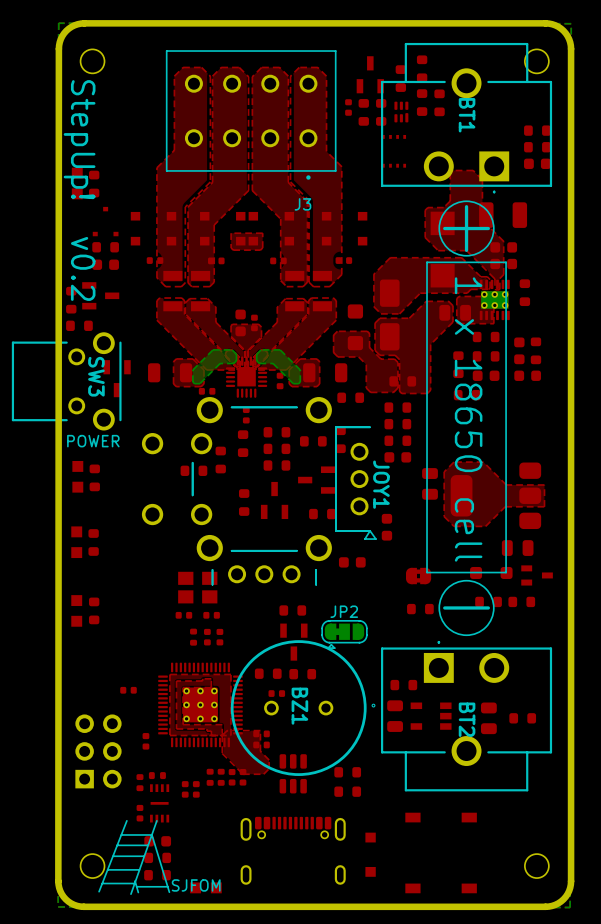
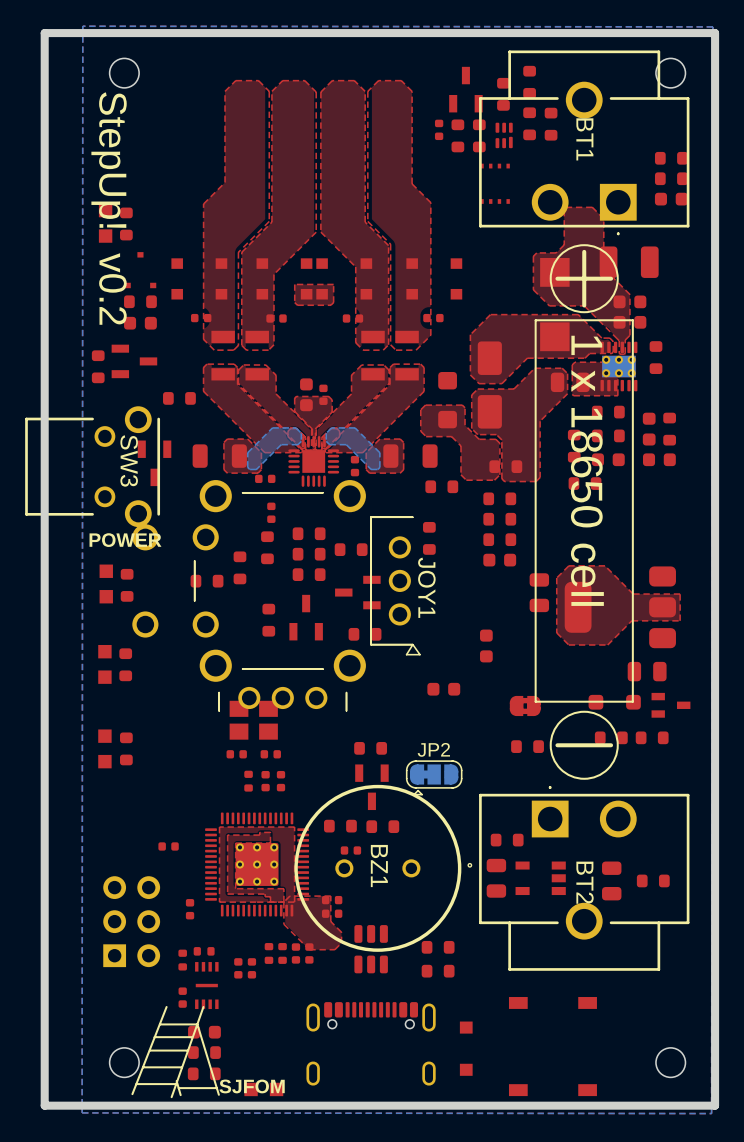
board edge: (545, 23) (84, 23) (71, 26) (62, 36) (58, 48) (58, 881) (61, 894) (71, 903) (83, 906) (545, 906) (558, 903) (567, 894) (571, 881) (571, 48) (569, 39) (563, 30) (555, 25) (545, 23) -> (715, 33) (715, 1105) (44, 1105) (44, 33) (715, 33)
J3: (251, 115) -> none
part position: (79, 325) -> (179, 398)
part position: (246, 415) -> (271, 512)
part: (276, 432) -> none
part: none -> (309, 533)
part: (313, 441) -> none
part: (243, 443) -> none
part: none -> (267, 547)
part: none -> (309, 554)
part: (220, 460) -> none
part: (276, 465) -> none
part: none -> (309, 574)
part rotation: 0° (193, 470) -> 90° clockwise (239, 567)
part: none -> (207, 581)
part: (316, 480) -> none
part: none -> (357, 592)
part footprint: [239, 489, 250, 516] -> [289, 594, 323, 641]
JOY1 position: (259, 491) -> (276, 595)
part: (274, 500) -> none
part: none -> (268, 620)
part: (322, 514) -> none
part: none -> (365, 634)

